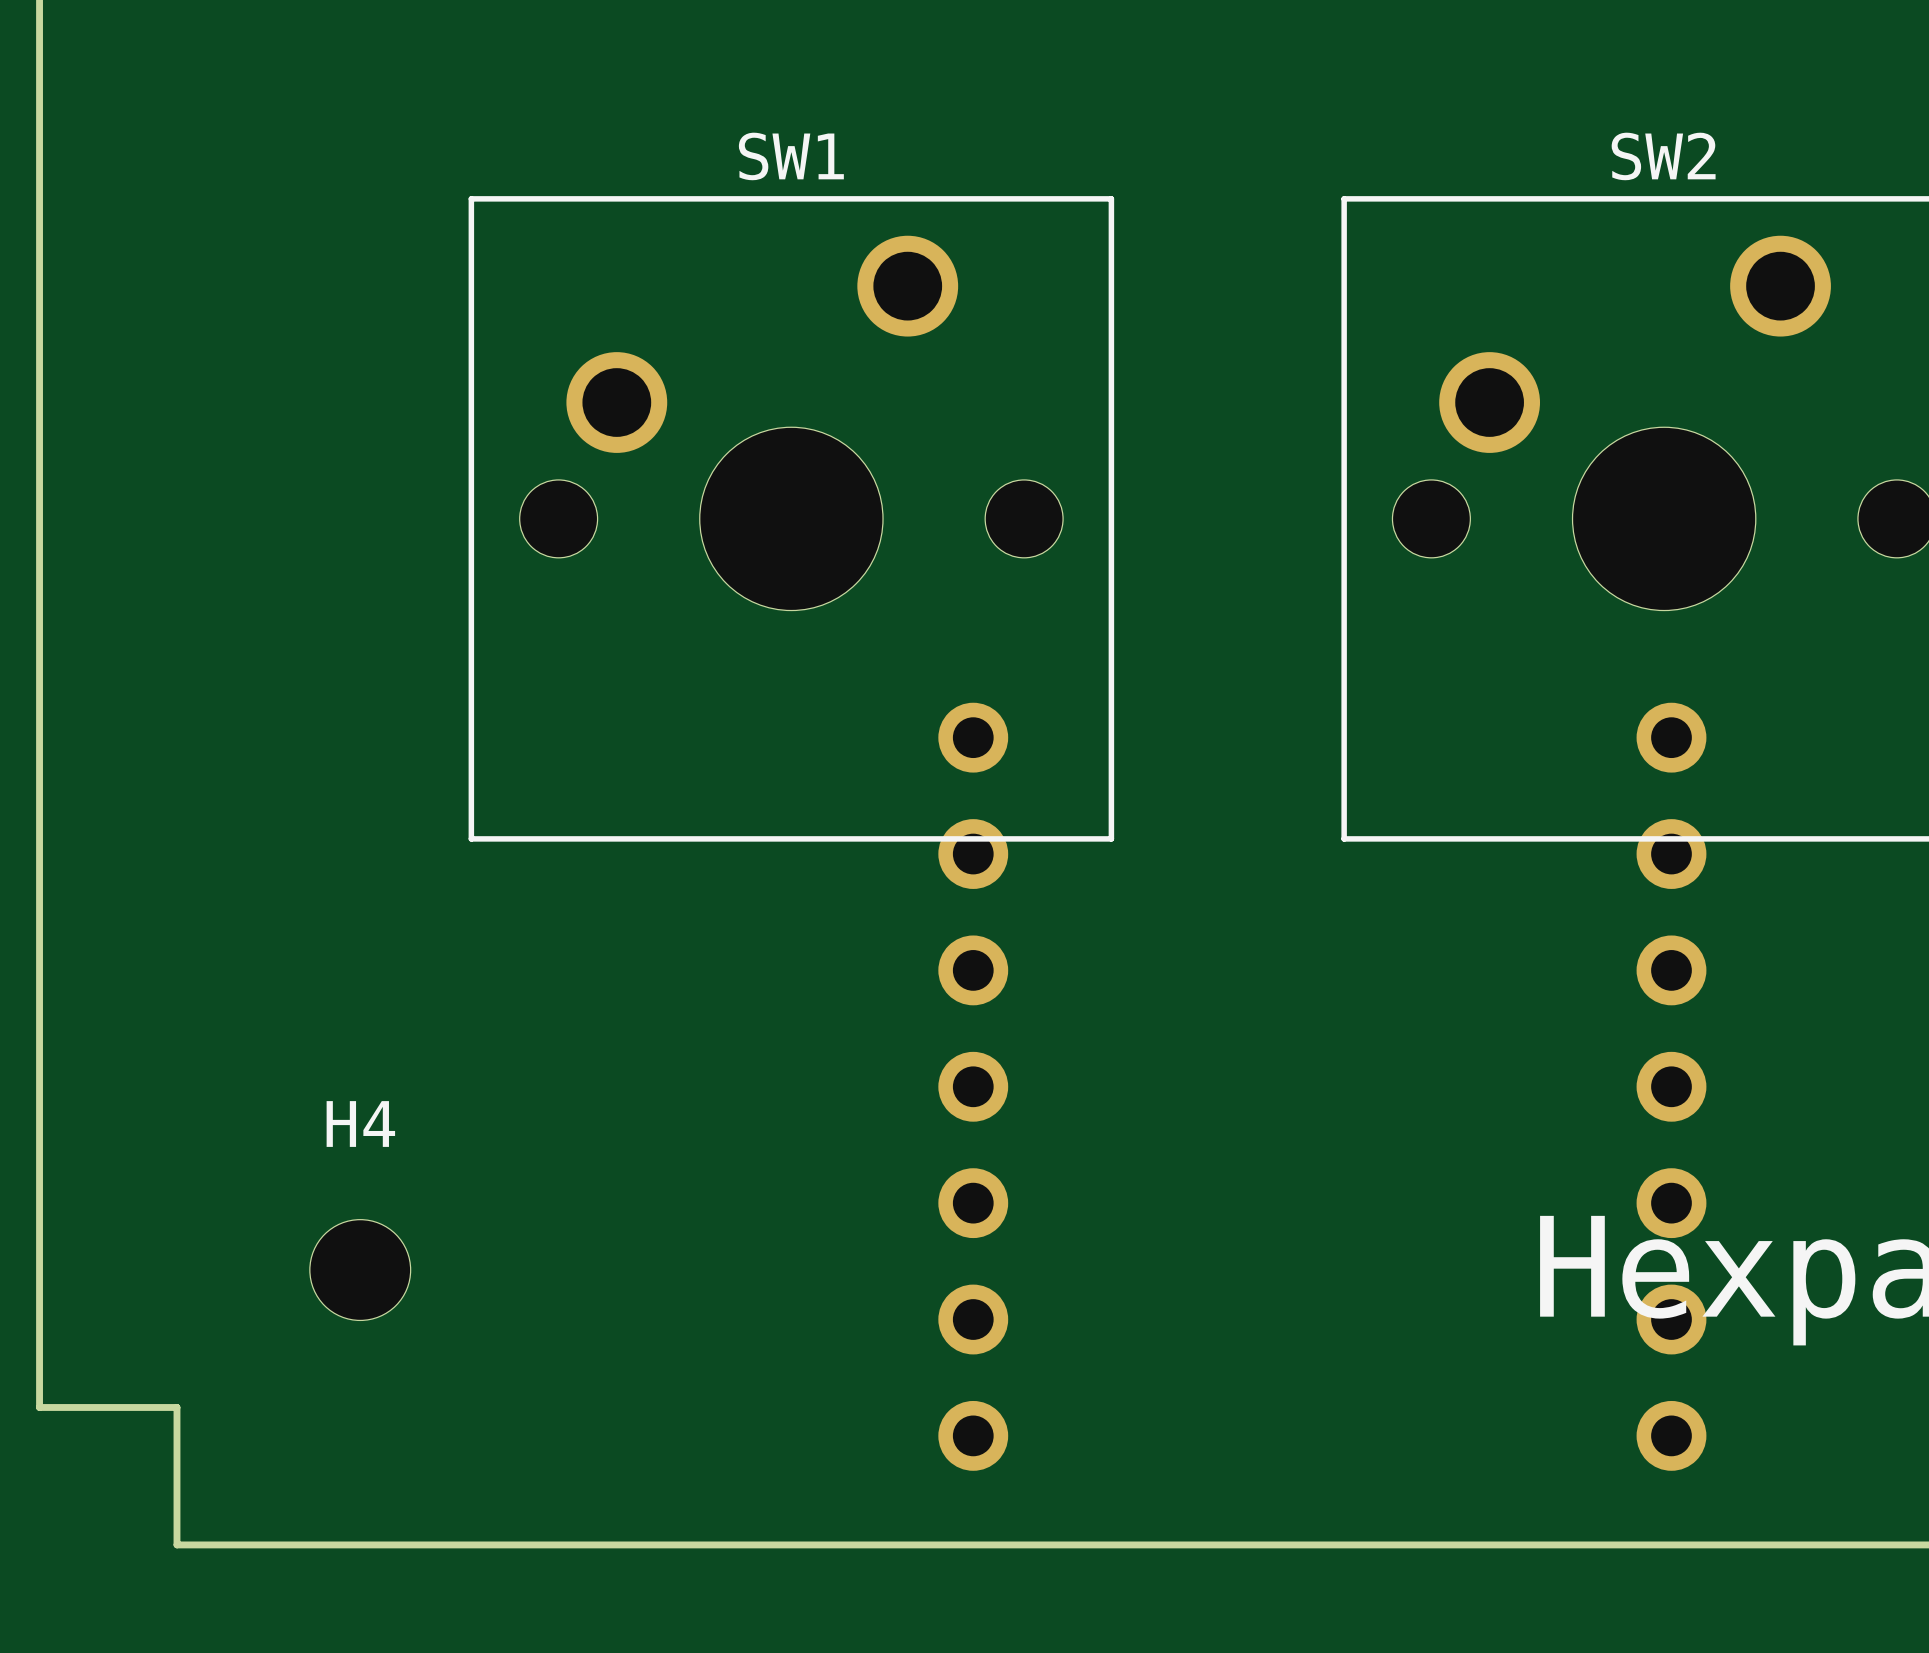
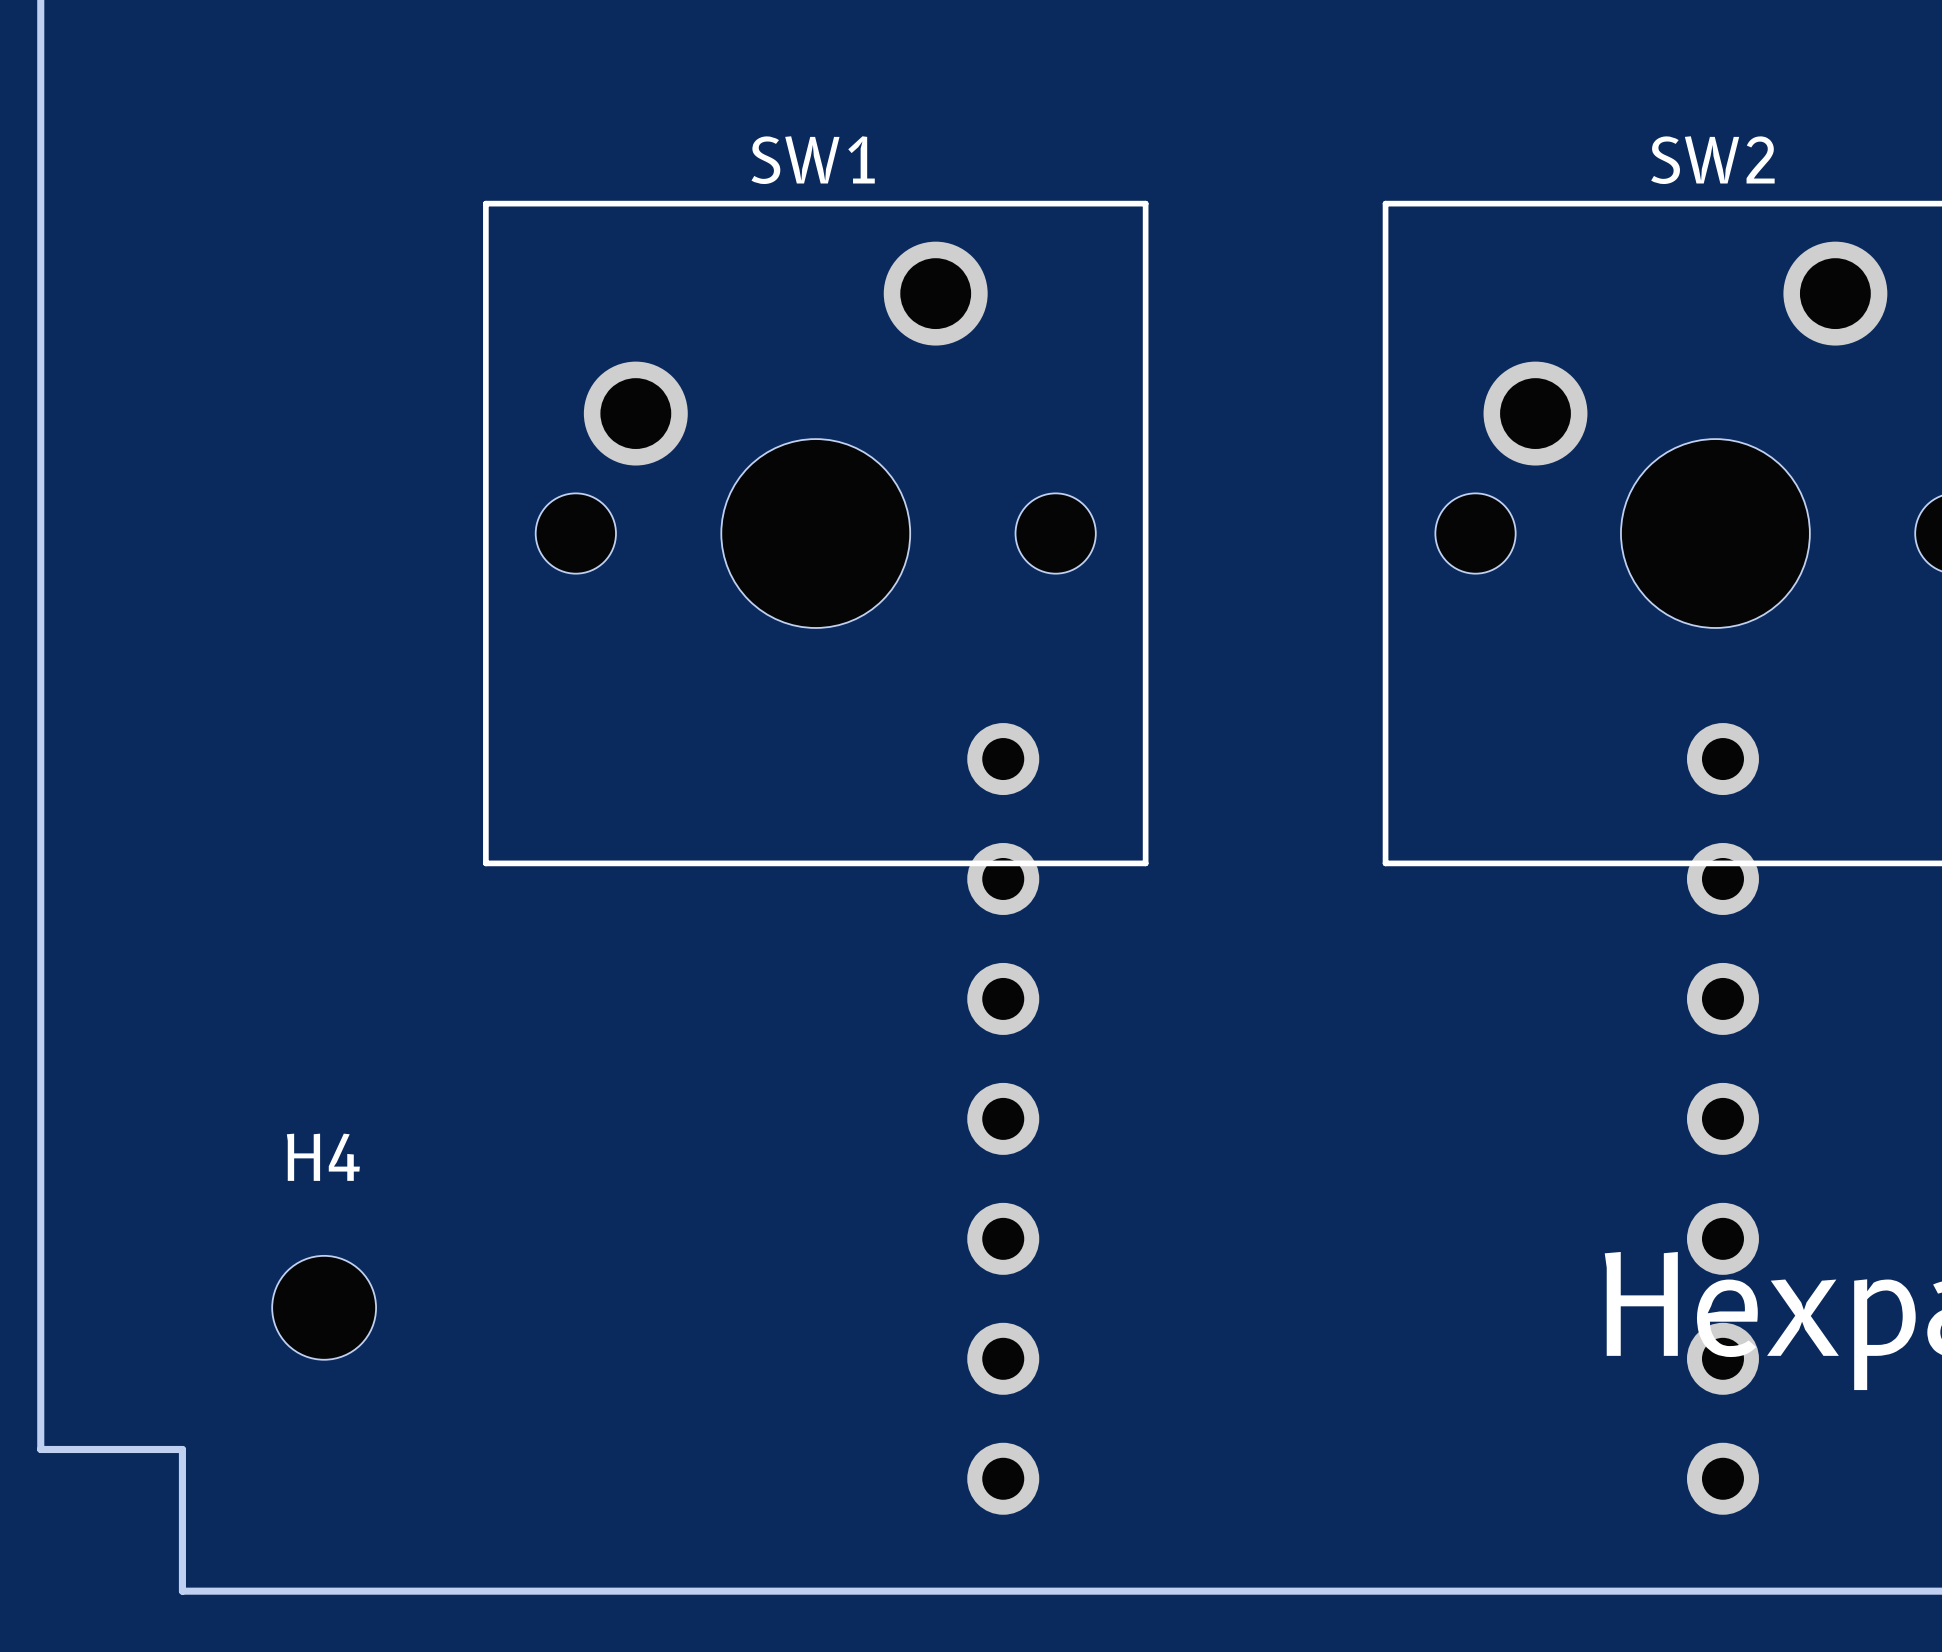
H4 position: (360, 1270) -> (324, 1307)

